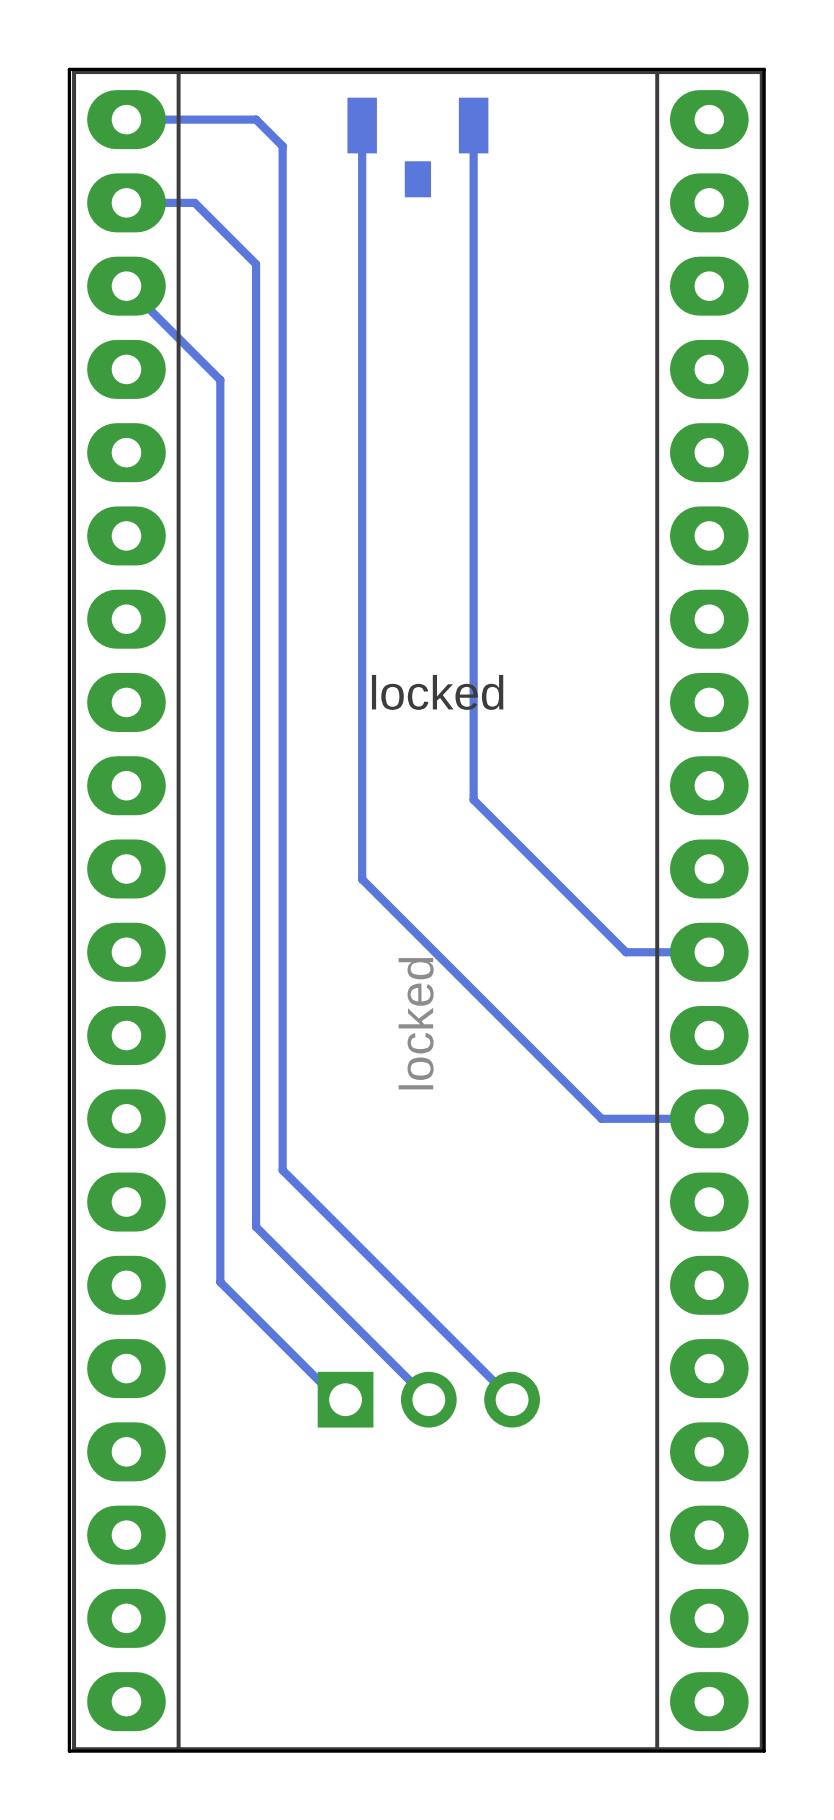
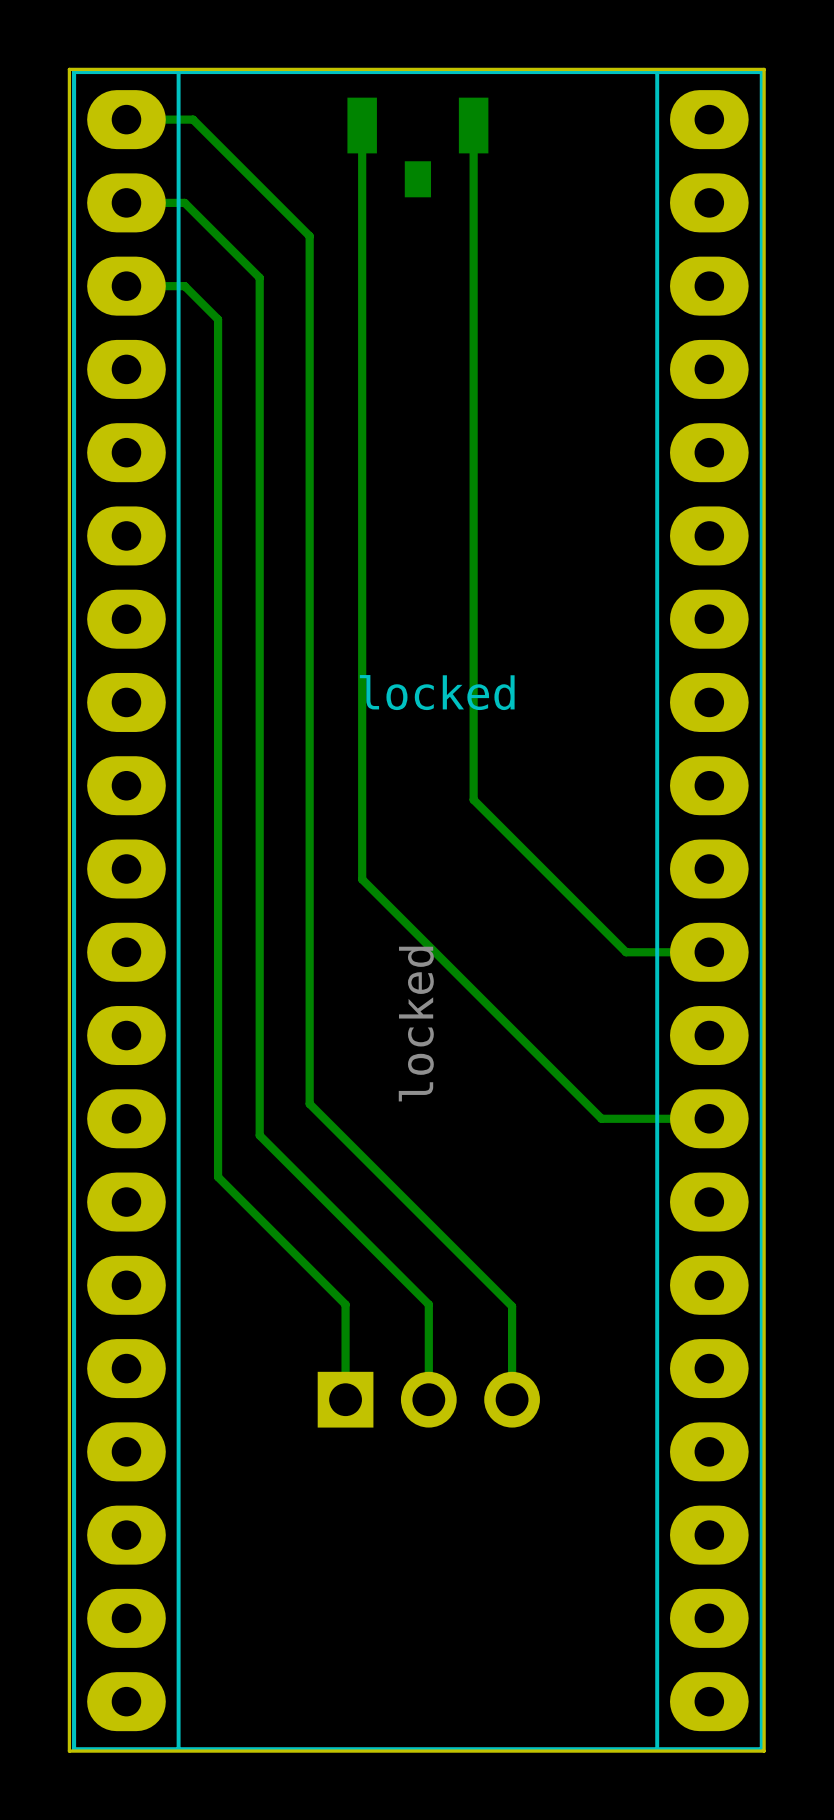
bottom track: (193, 119) (256, 119) (282, 146) (282, 1170) (512, 1399) -> (193, 119) (309, 236) (309, 1103) (512, 1306) (512, 1399)
bottom track: (184, 202) (194, 202) (256, 264) (256, 1226) (428, 1399) -> (184, 202) (259, 277) (259, 1135) (428, 1304) (428, 1399)
bottom track: (126, 286) (220, 379) (220, 1282) (337, 1399) (345, 1399) -> (126, 286) (184, 286) (218, 319) (218, 1177) (345, 1304) (345, 1399)

